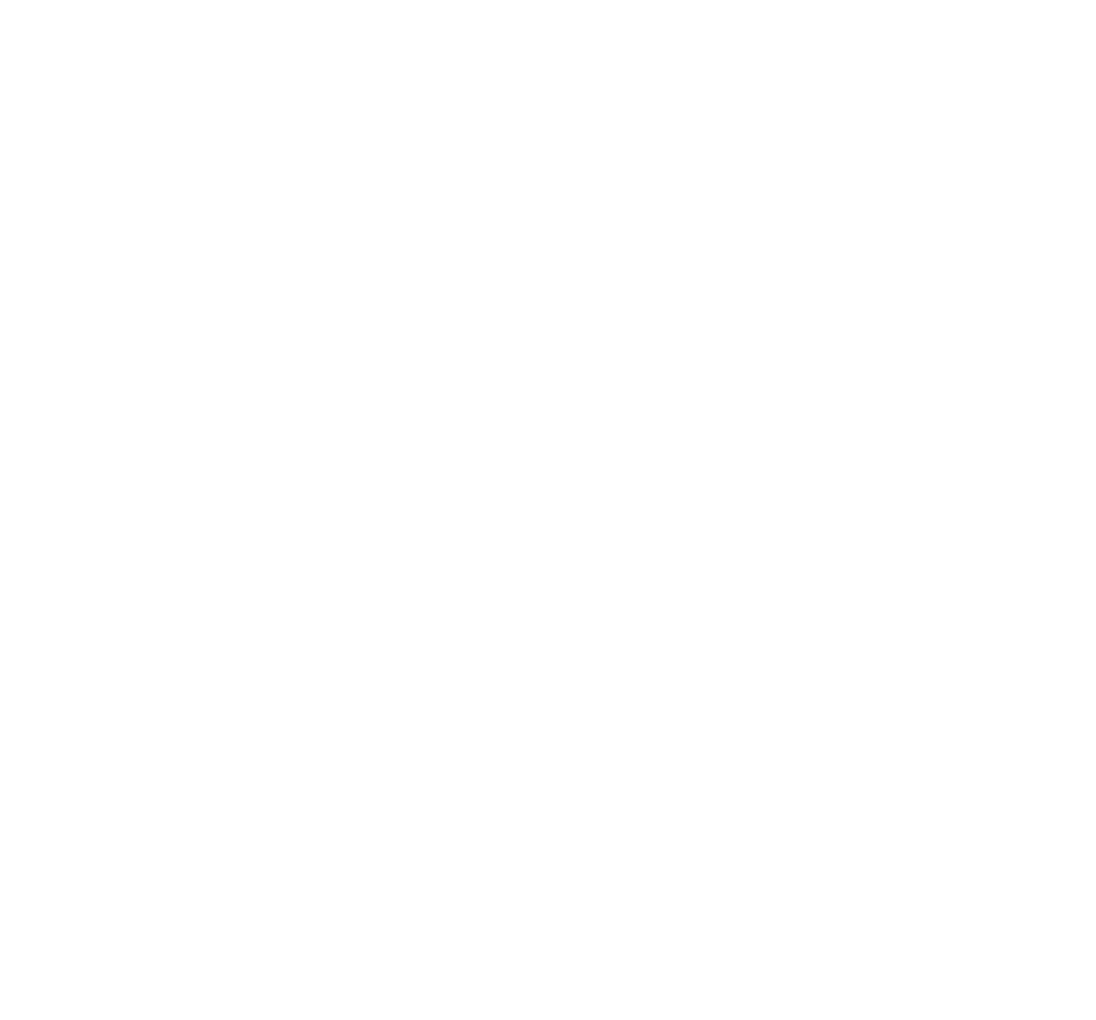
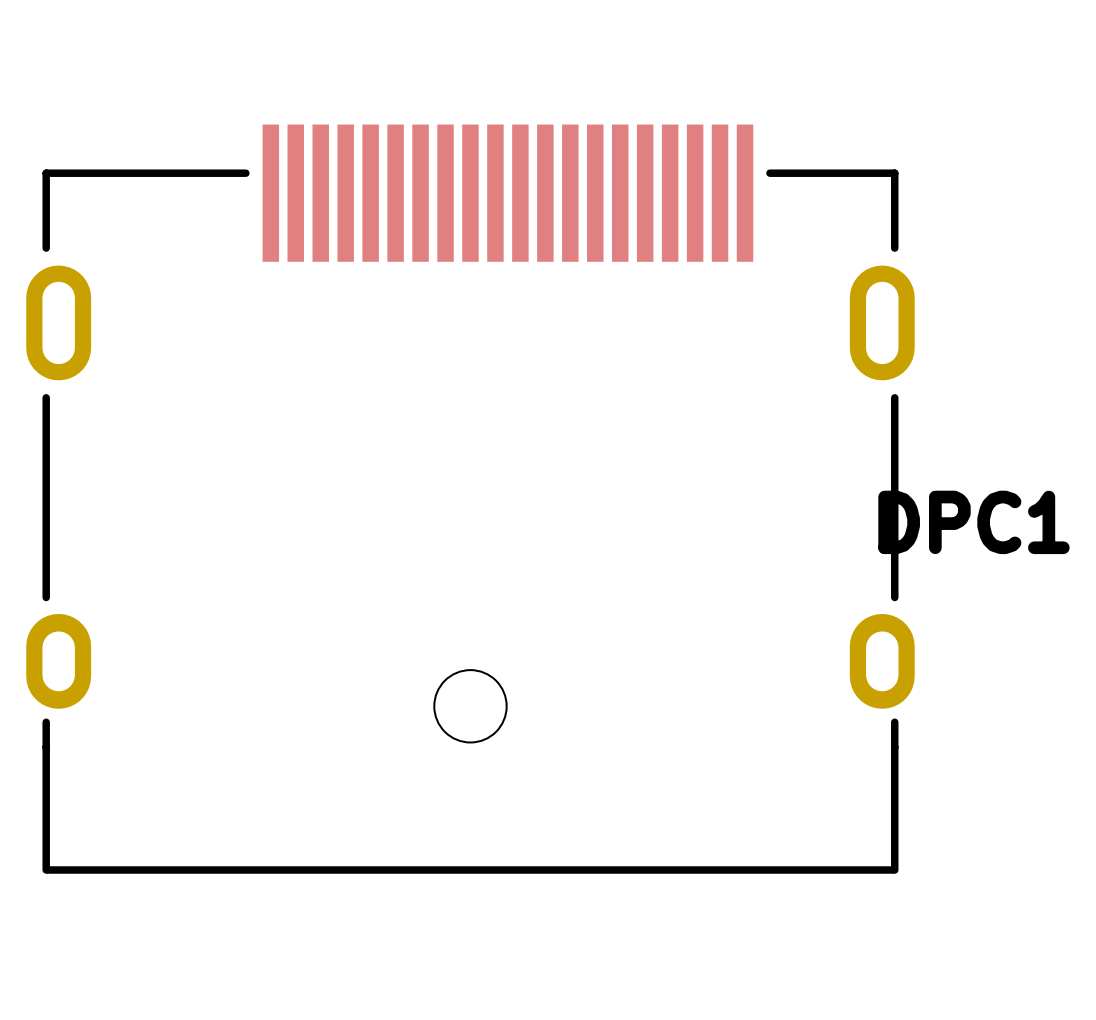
DPC1: none -> (470, 499)

